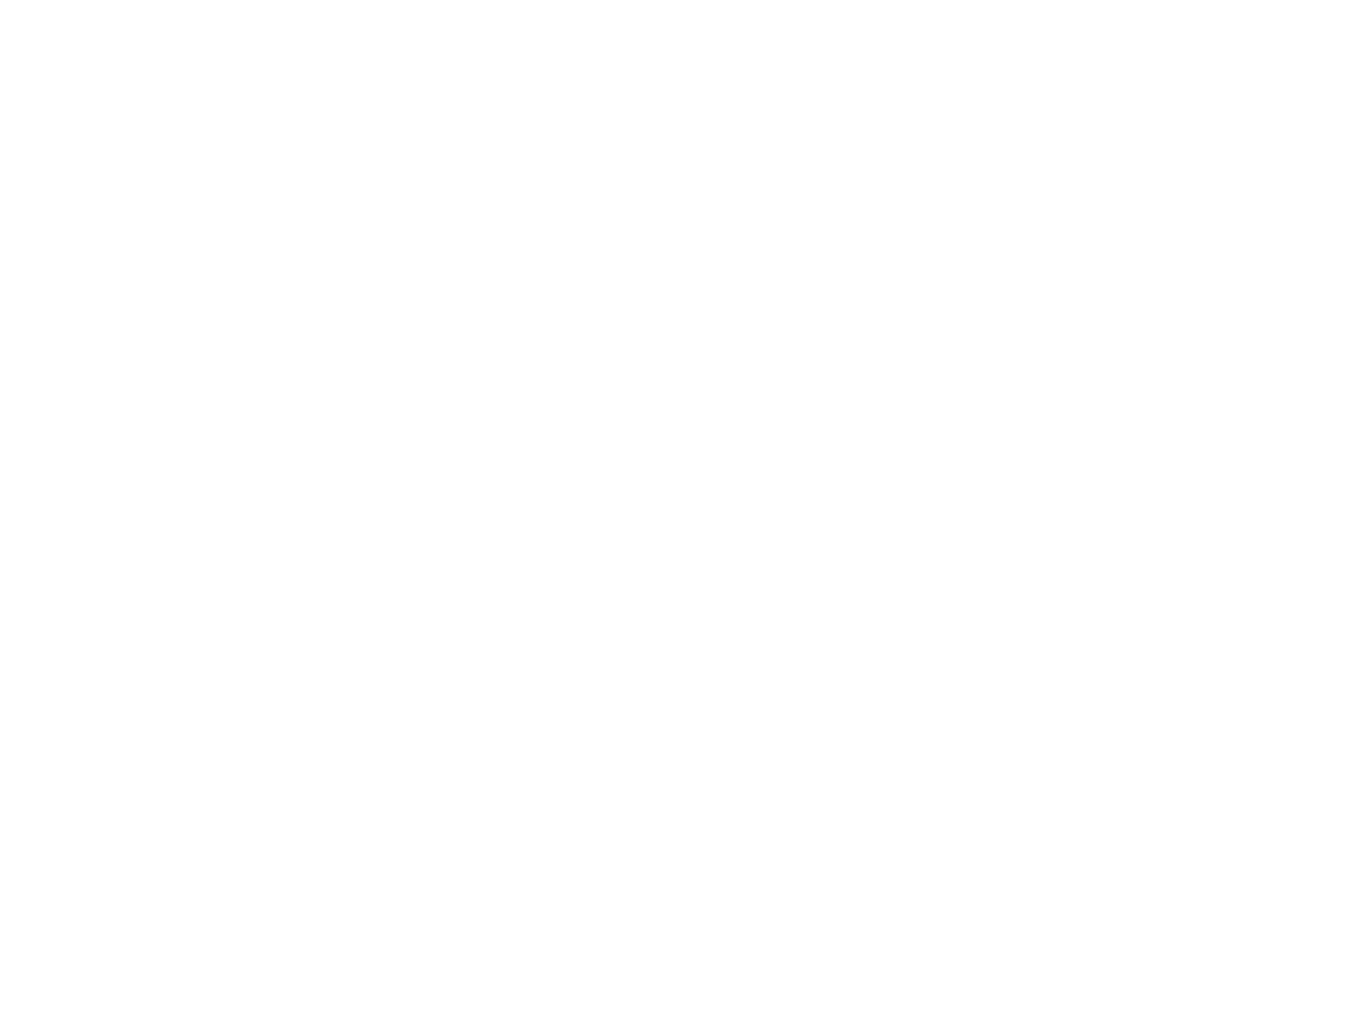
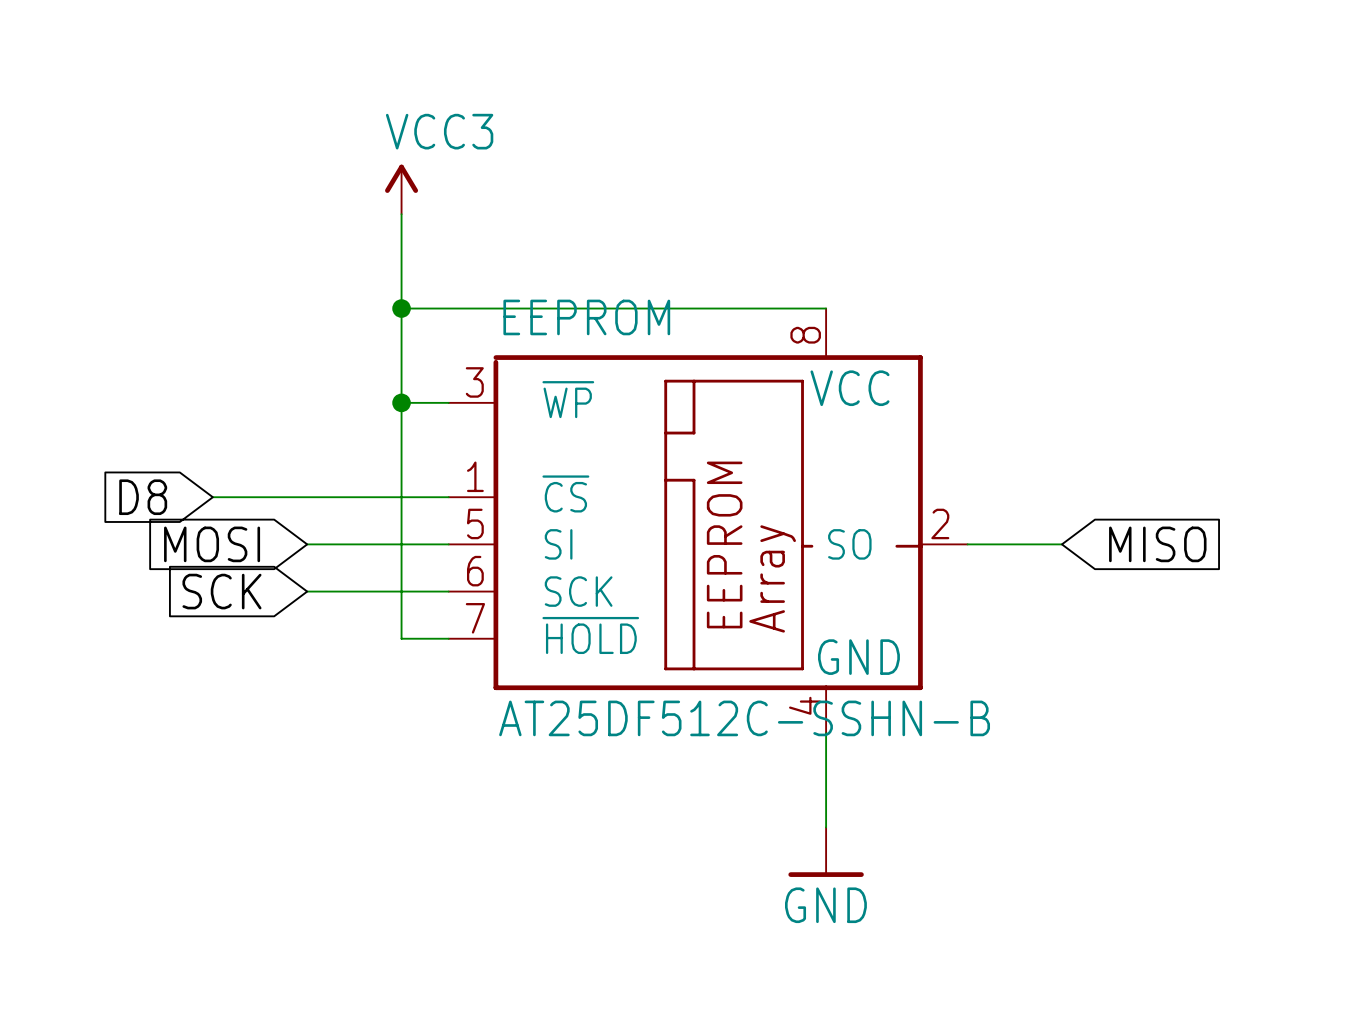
power symbol: none -> VCC3 (401, 189)
wire: none -> (401, 214) (401, 638) (448, 638)
wire: none -> (401, 308) (826, 308)
junction: none -> (401, 308)
wire: none -> (401, 402) (448, 402)
junction: none -> (401, 402)
global label: none -> D8 (143, 497)
wire: none -> (212, 497) (448, 497)
EEPROM: none -> AT25DF512C-SSHN-B (708, 520)
global label: none -> MOSI (212, 544)
wire: none -> (307, 544) (448, 544)
wire: none -> (967, 544) (1061, 544)
global label: none -> MISO (1157, 544)
global label: none -> SCK (221, 591)
wire: none -> (307, 591) (448, 591)
wire: none -> (826, 733) (826, 827)
power symbol: none -> GND (826, 852)

